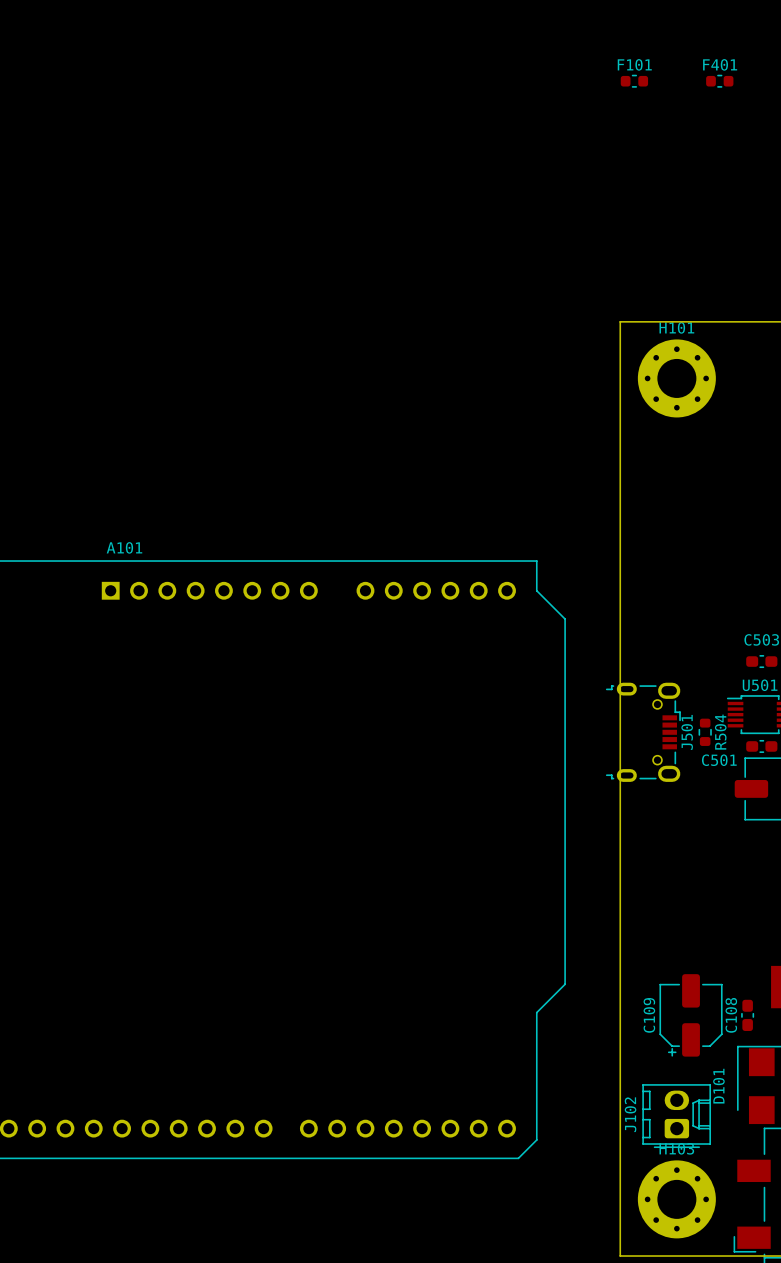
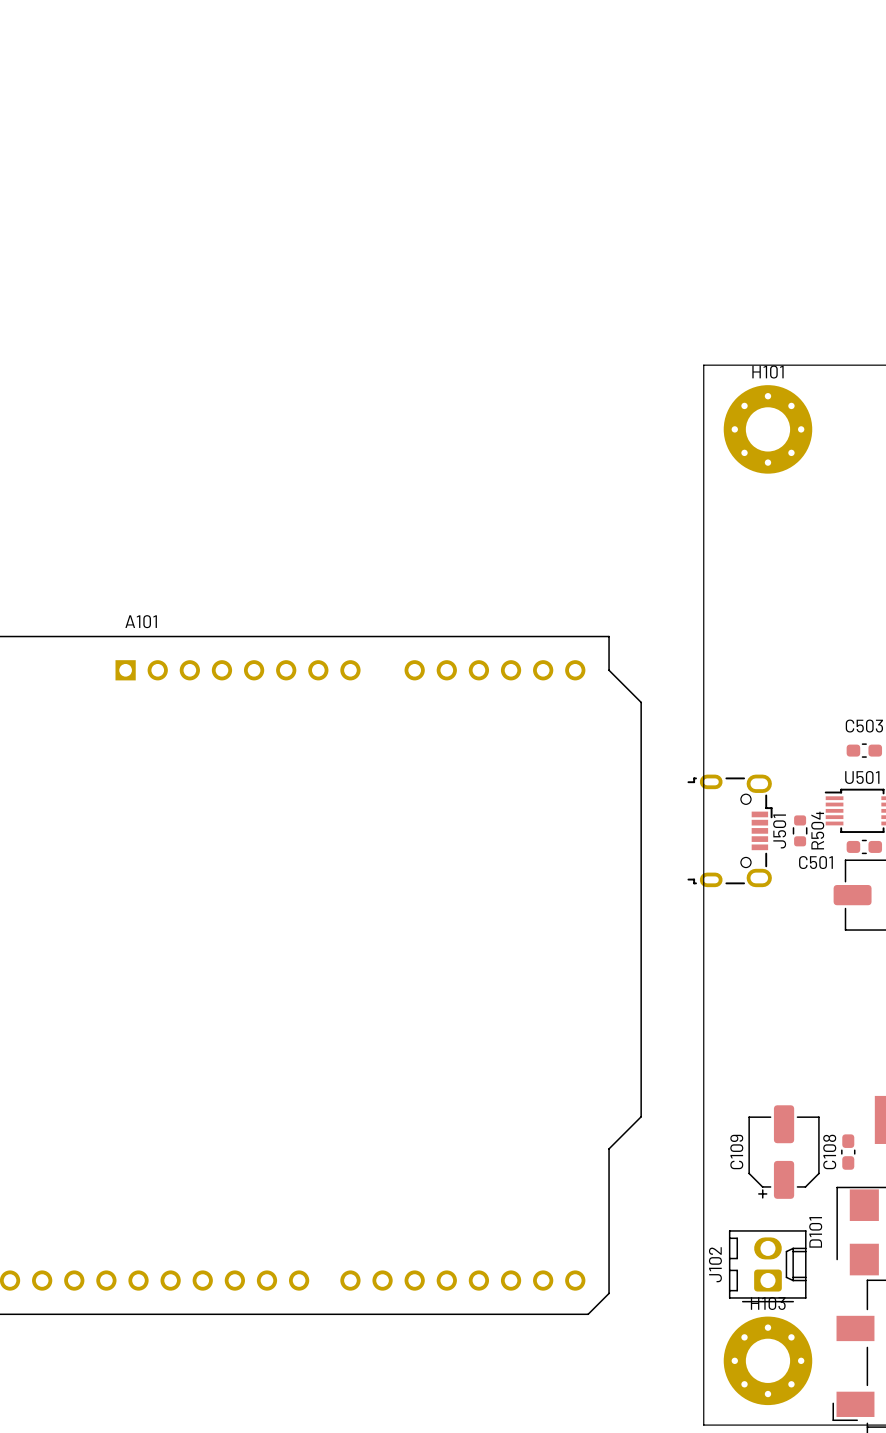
F101: (634, 81) -> none
F401: (719, 81) -> none

